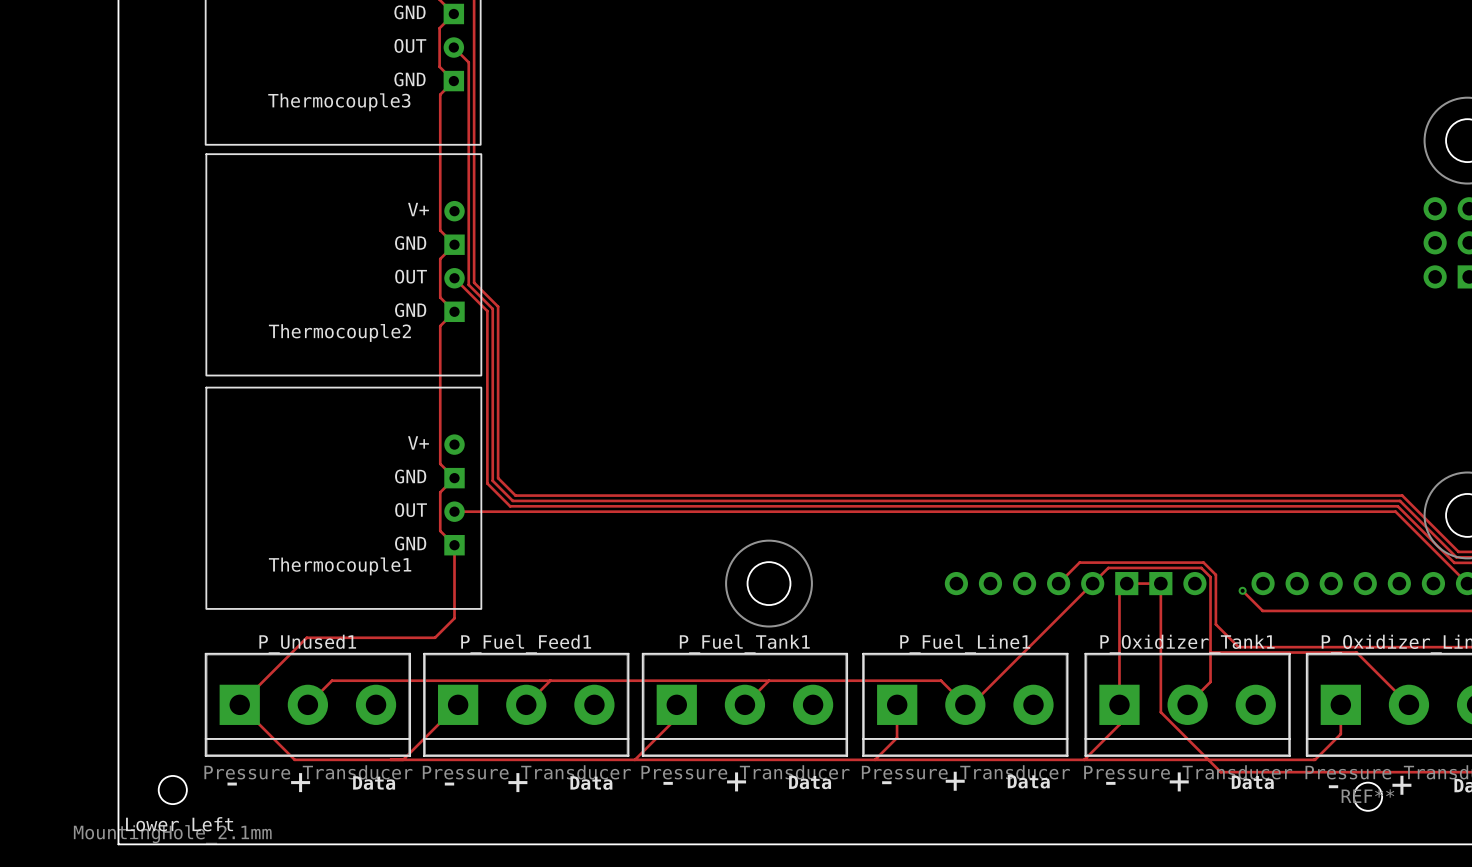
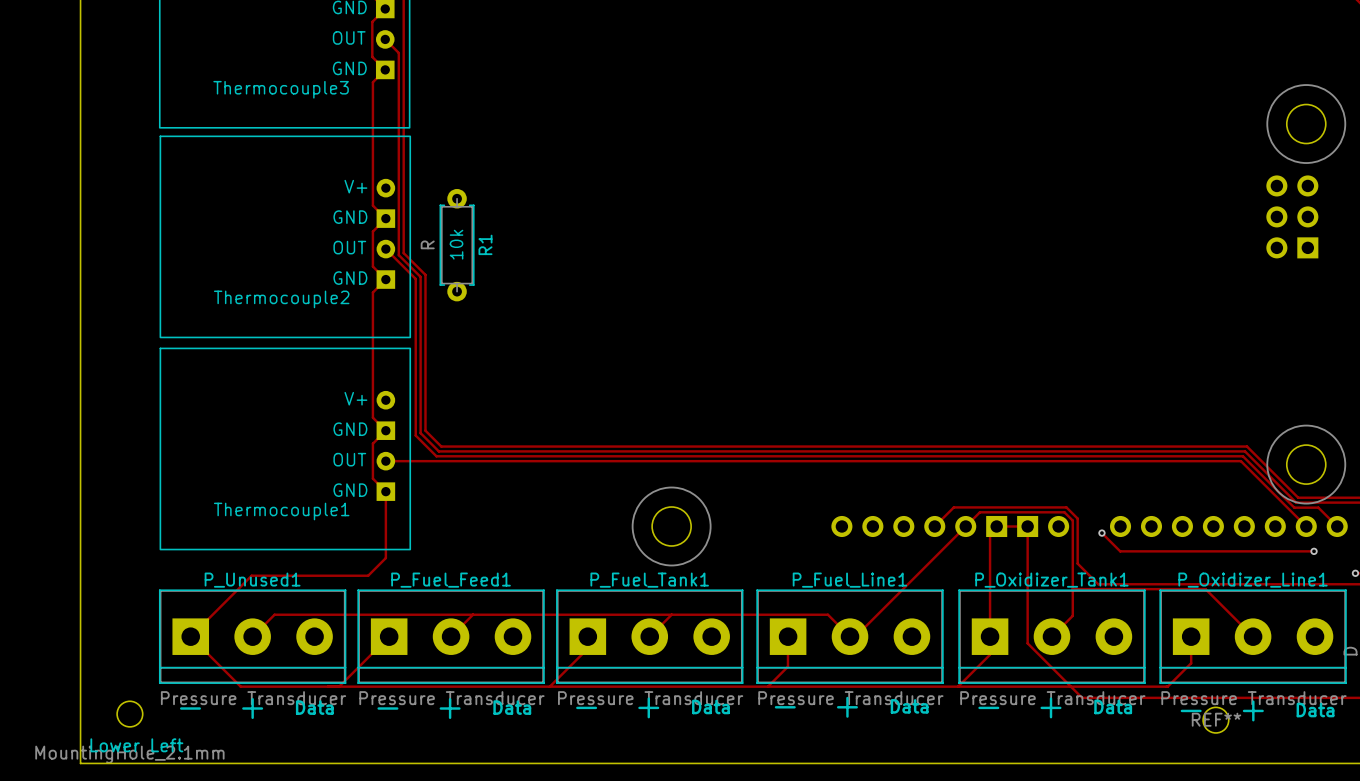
R1: none -> R (457, 245)
text: none -> 10k (456, 244)

